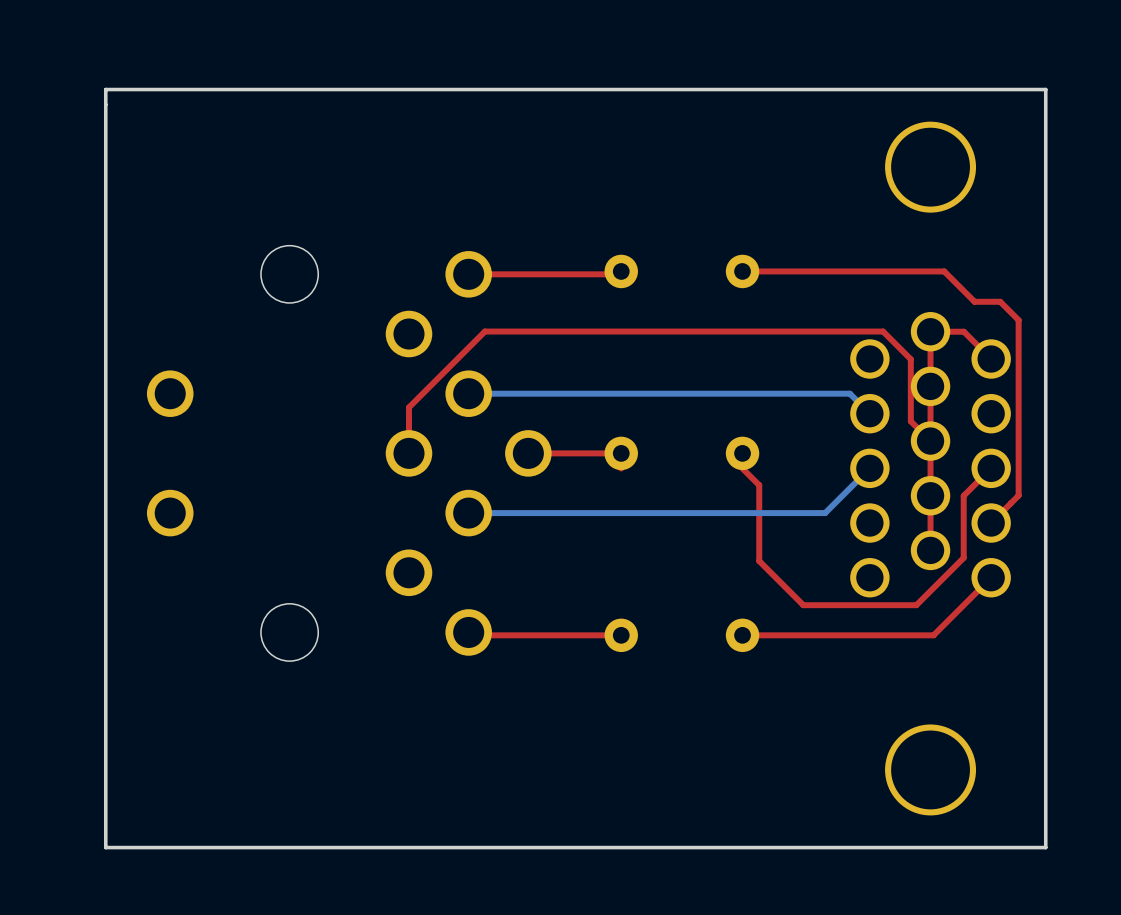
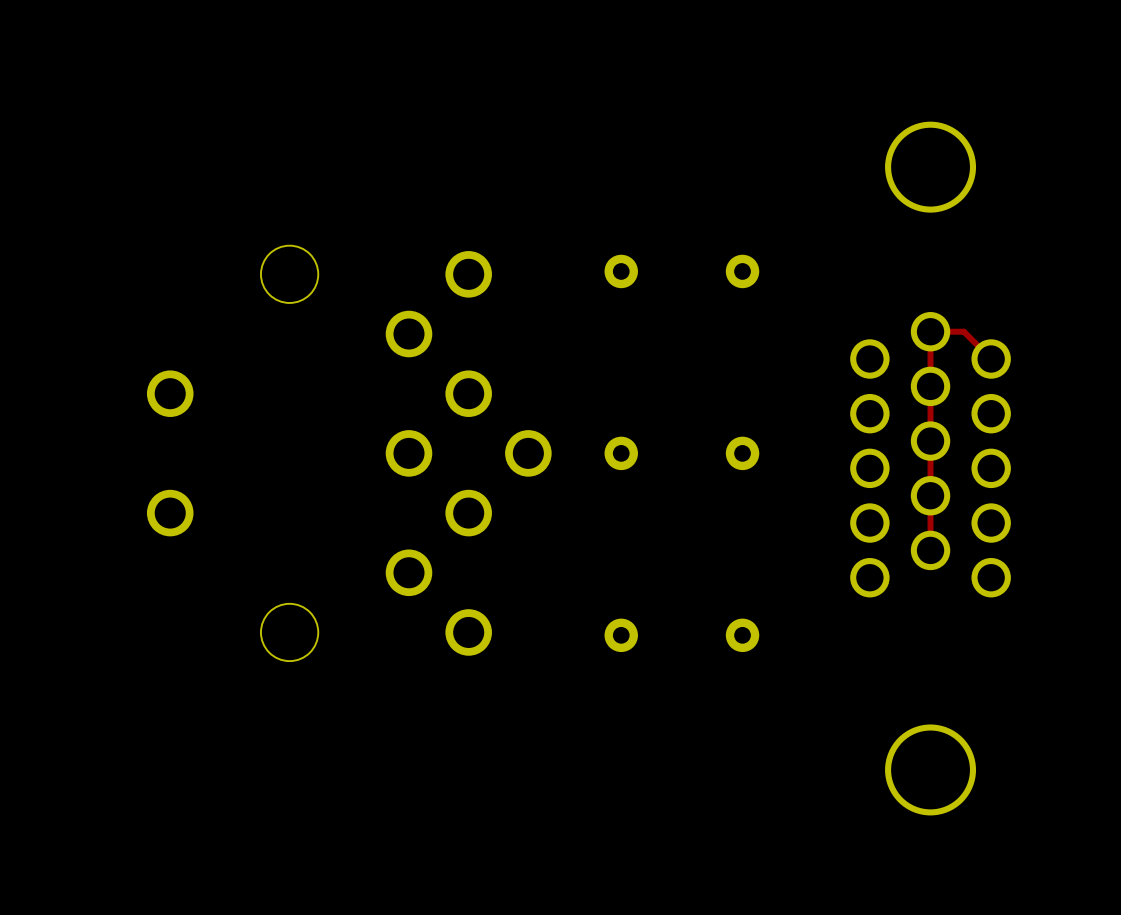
board edge: (1045, 89) (105, 89) (105, 847) (1045, 847) (1045, 89) -> none
top track: (621, 271) (618, 274) (468, 274) -> none
top track: (742, 271) (944, 271) (974, 301) (1000, 301) (1018, 320) (1018, 495) (991, 523) -> none
bottom track: (468, 393) (849, 393) (869, 413) -> none
top track: (930, 441) (910, 421) (910, 359) (883, 331) (484, 331) (408, 407) (408, 453) -> none
top track: (528, 453) (606, 453) (621, 468) -> none
bottom track: (869, 468) (825, 513) (468, 513) -> none
top track: (991, 468) (963, 495) (963, 557) (916, 605) (803, 605) (759, 561) (759, 485) (742, 468) -> none
top track: (991, 577) (933, 635) (742, 635) -> none
top track: (468, 632) (471, 635) (621, 635) -> none

